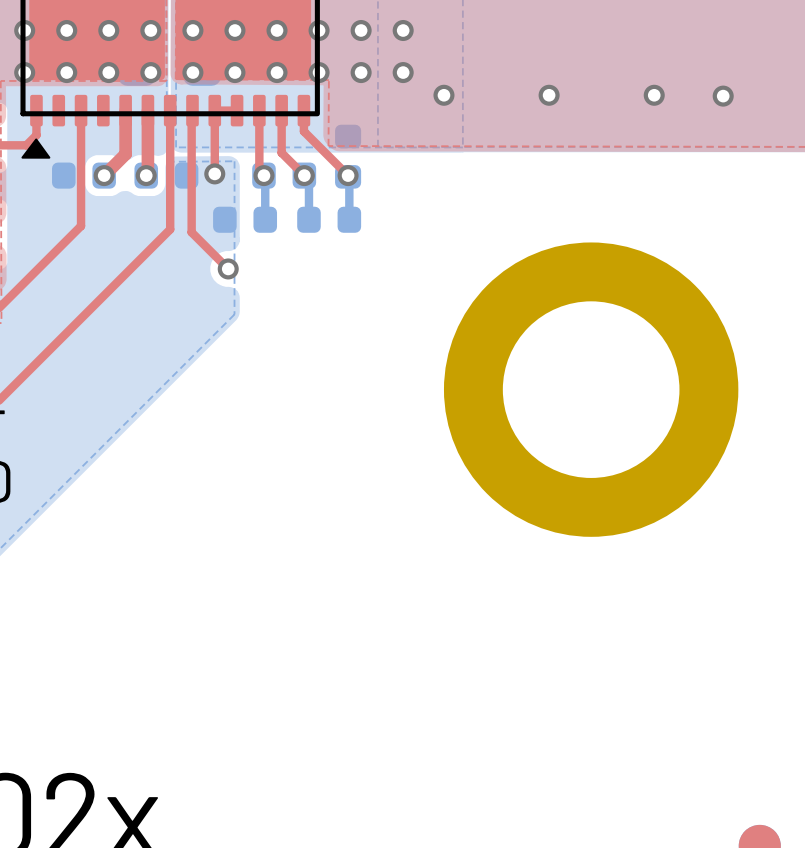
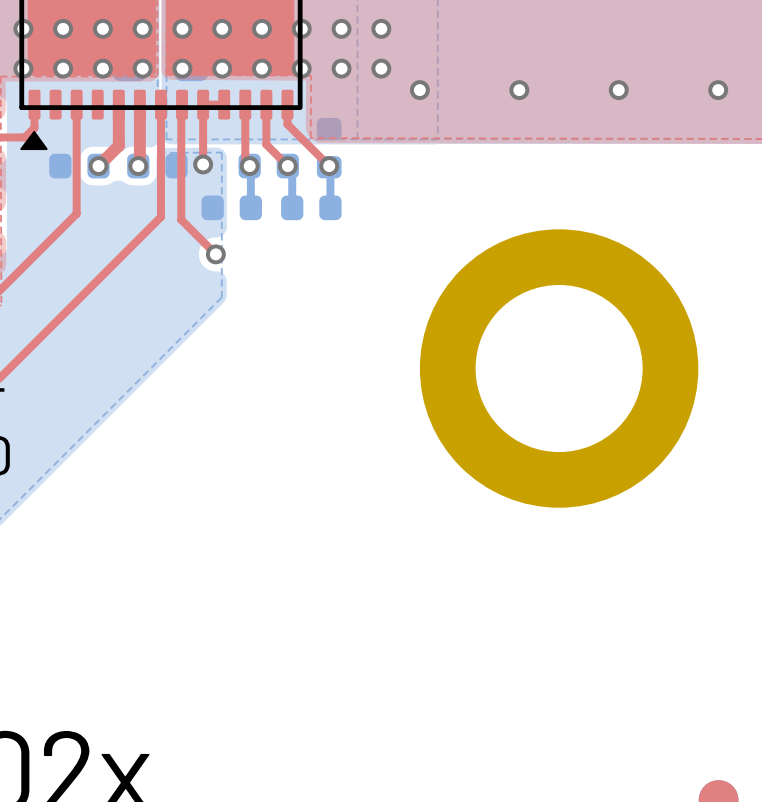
via: none -> (718, 90)
via: (723, 96) -> none

